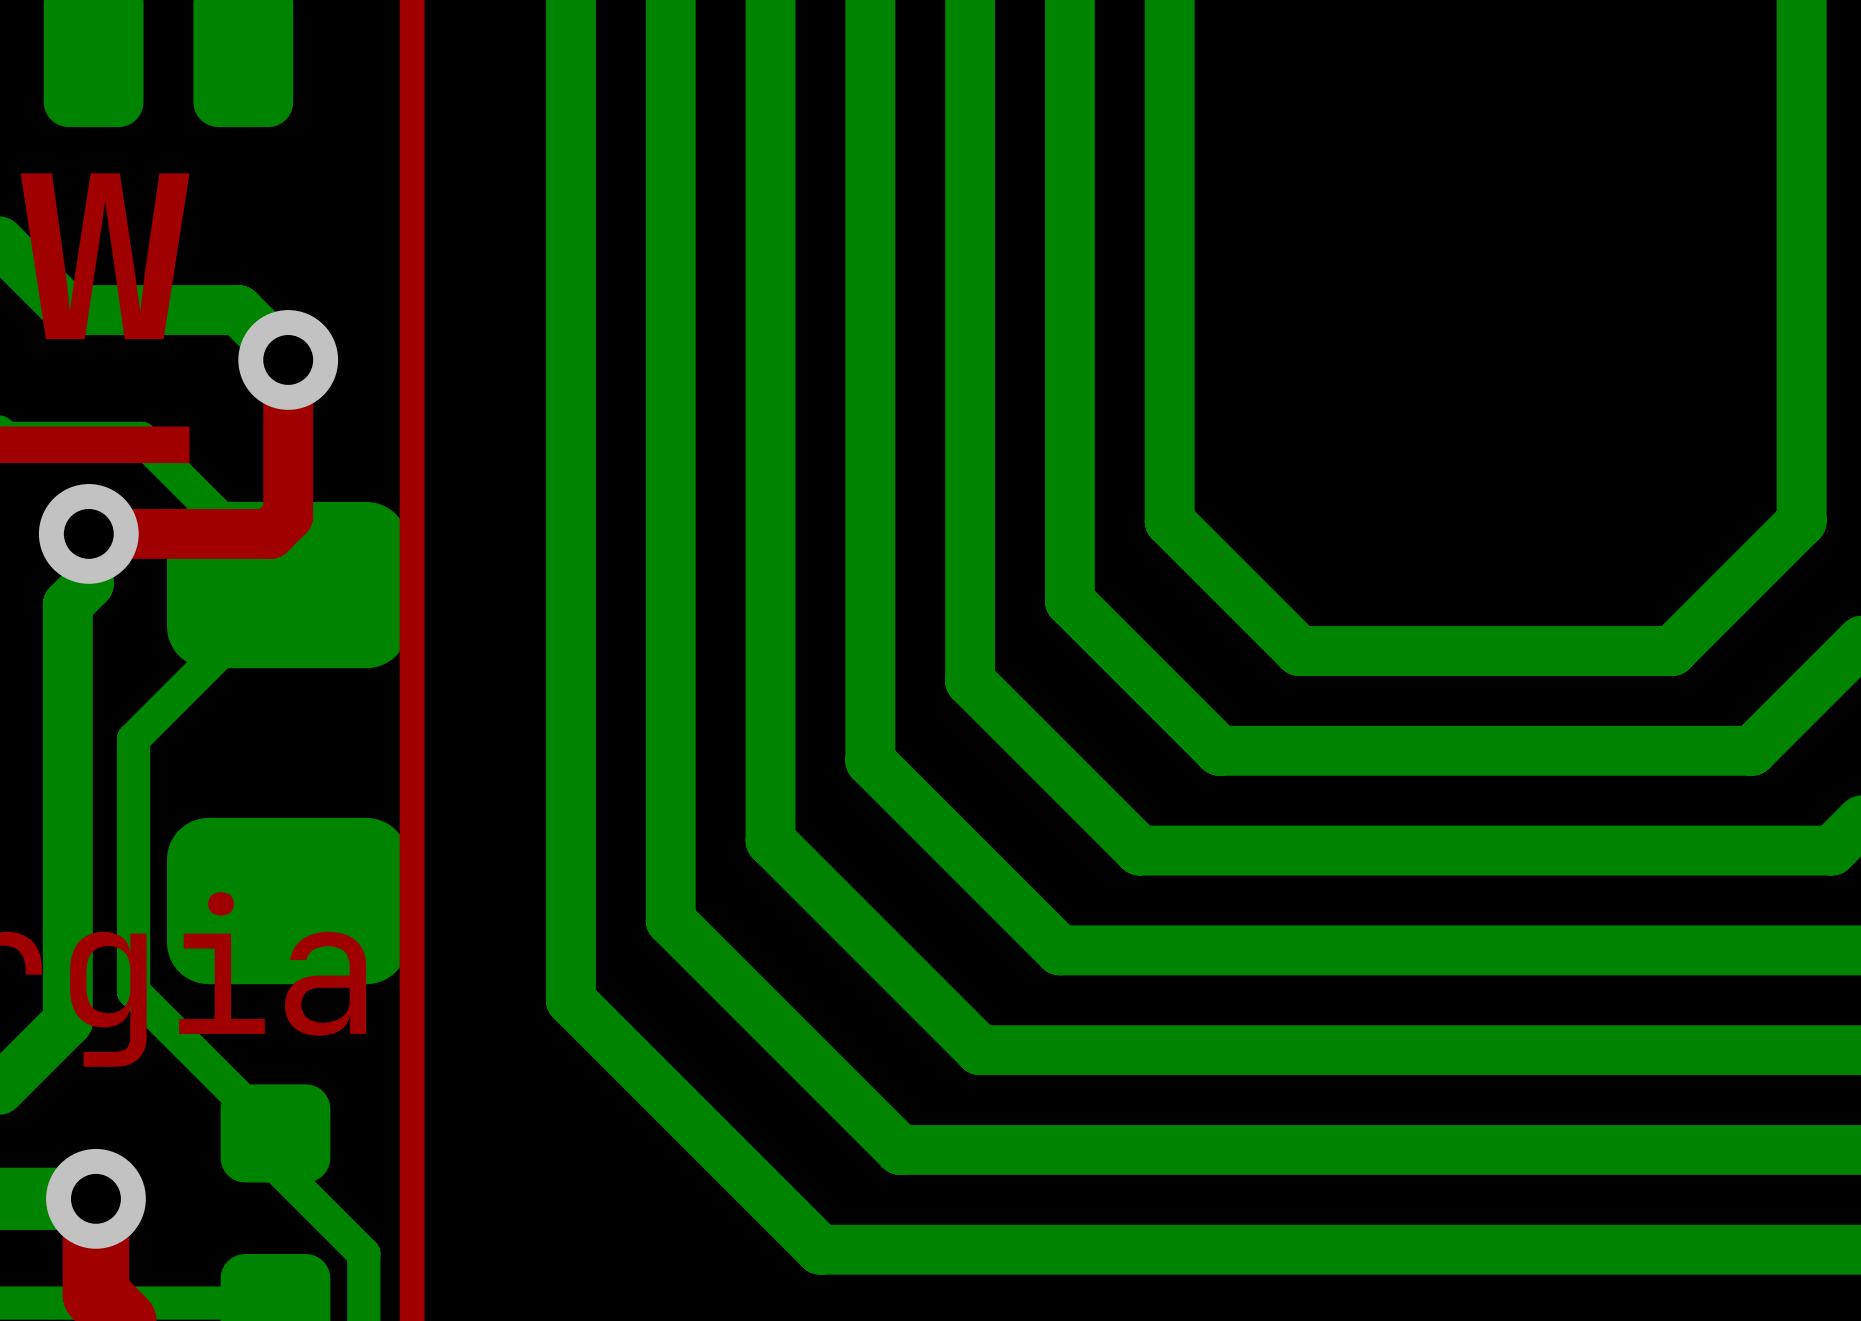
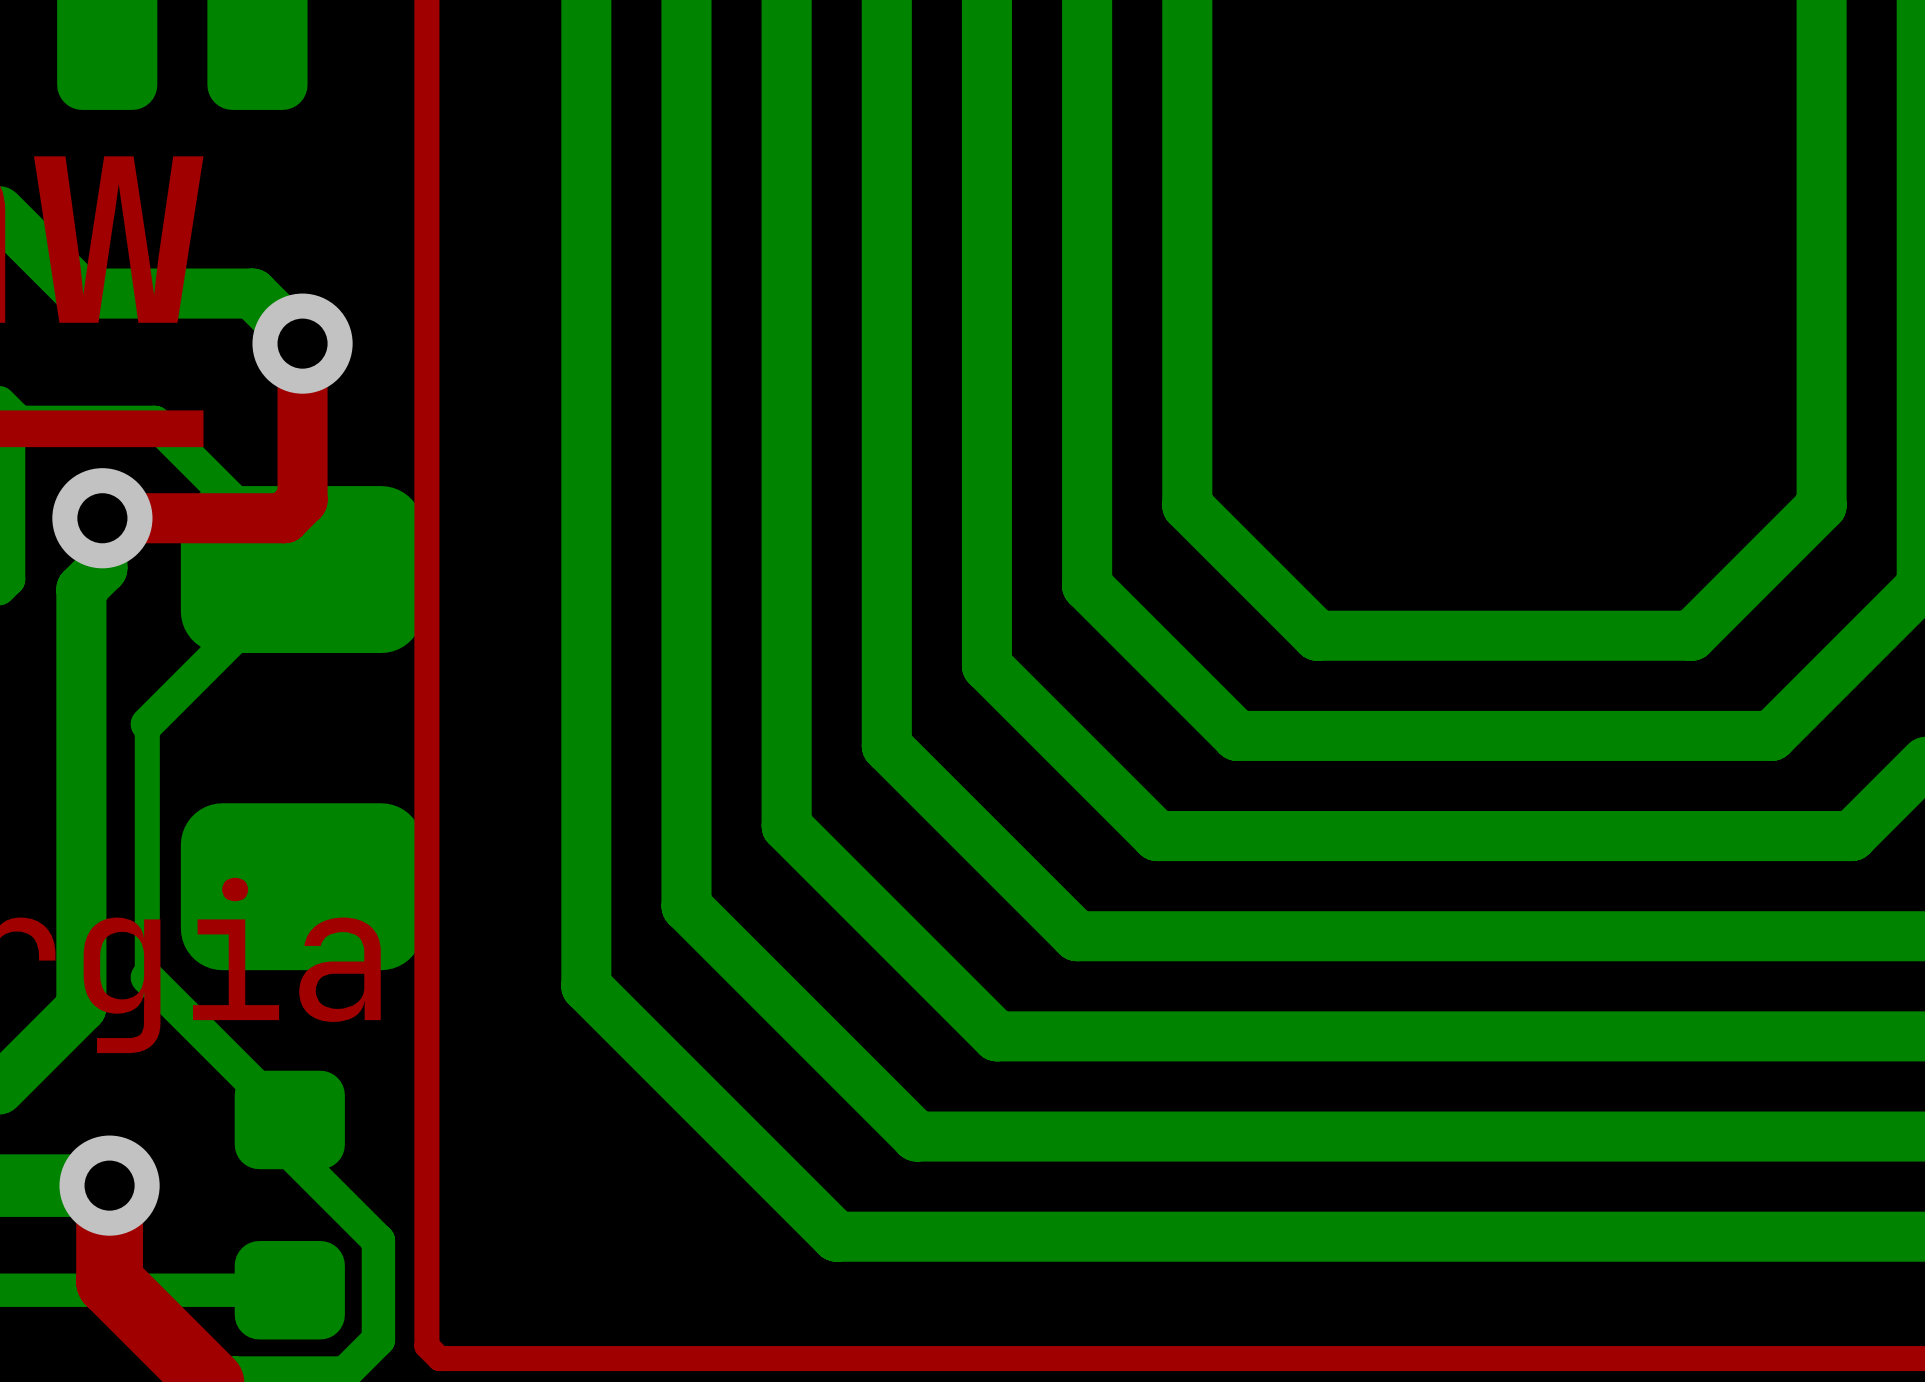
bottom track width: thick (133, 739) (133, 991) -> thin (147, 724) (147, 977)

